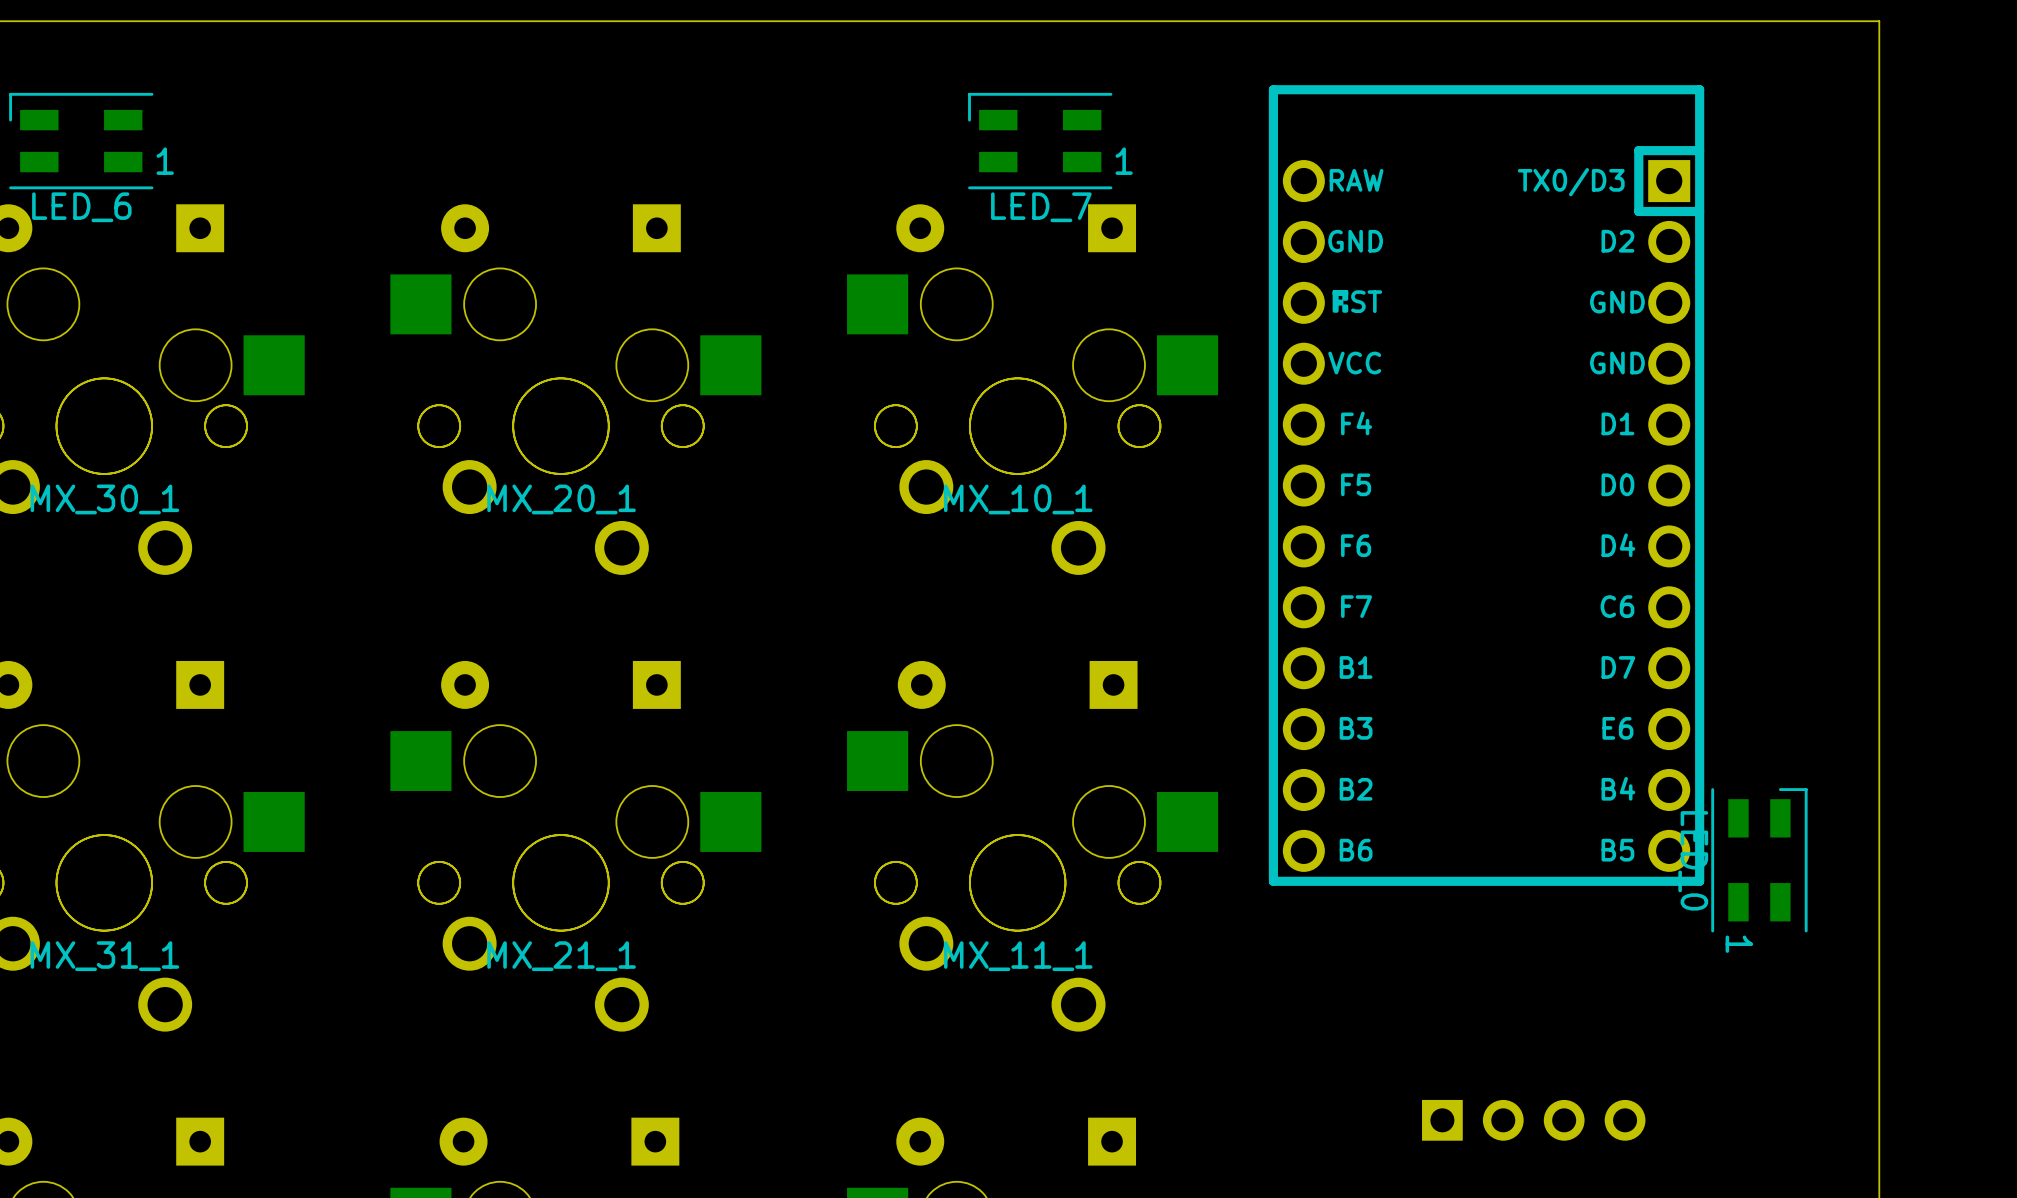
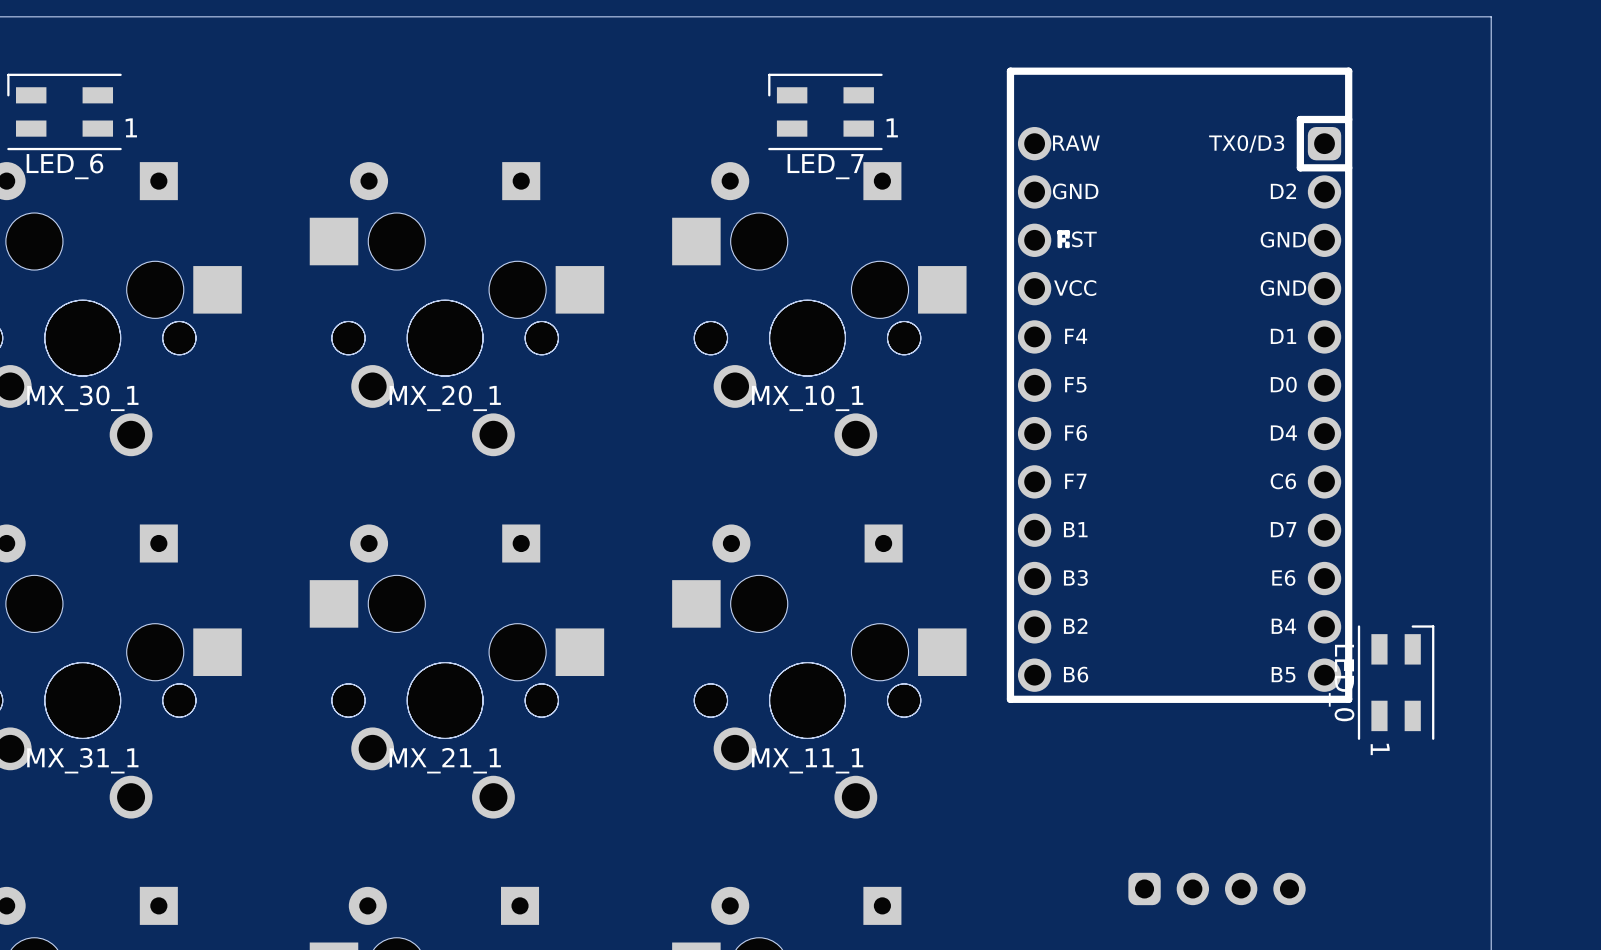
part footprint: [1268, 85, 1705, 886] -> [1006, 67, 1353, 703]
part footprint: [1422, 1099, 1646, 1141] -> [1128, 872, 1306, 906]

